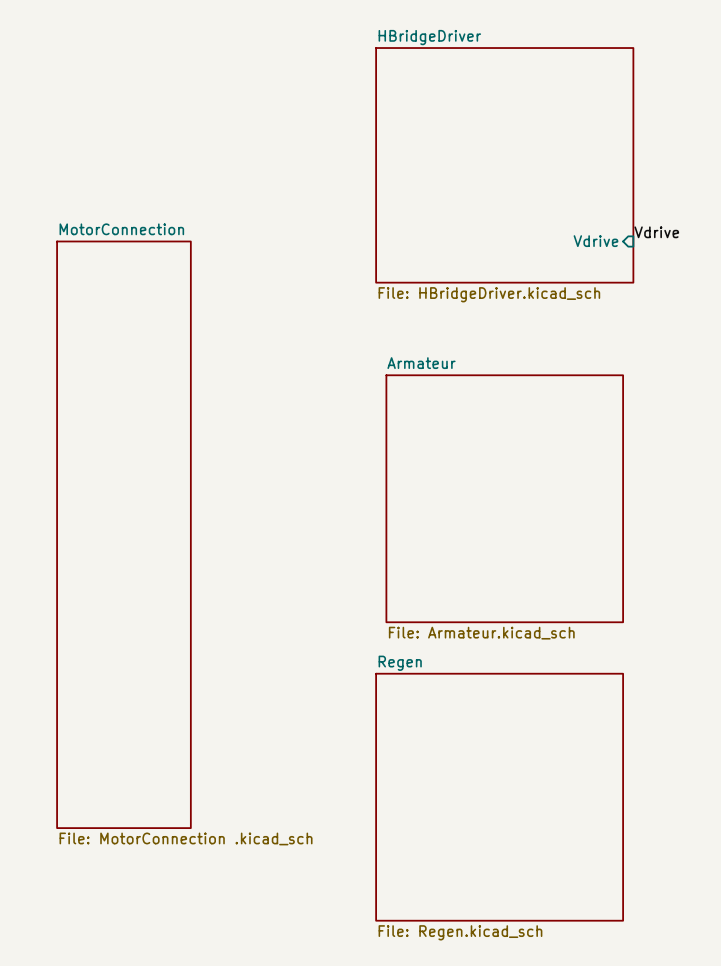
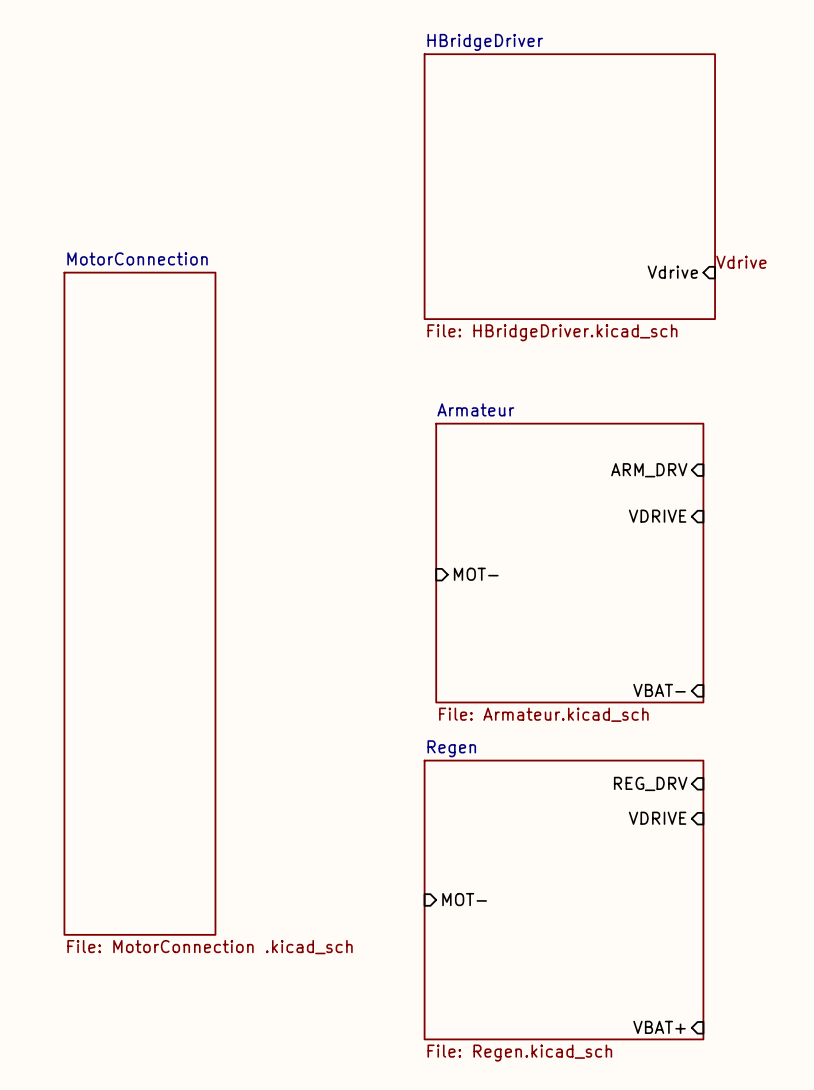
sheet pin: none -> ARM_DRV (649, 470)
sheet pin: none -> VDRIVE (657, 516)
sheet pin: none -> MOT- (476, 574)
sheet pin: none -> VBAT- (659, 690)
sheet pin: none -> REG_DRV (650, 783)
sheet pin: none -> VDRIVE (657, 818)
sheet pin: none -> MOT- (464, 899)
sheet pin: none -> VBAT+ (659, 1027)

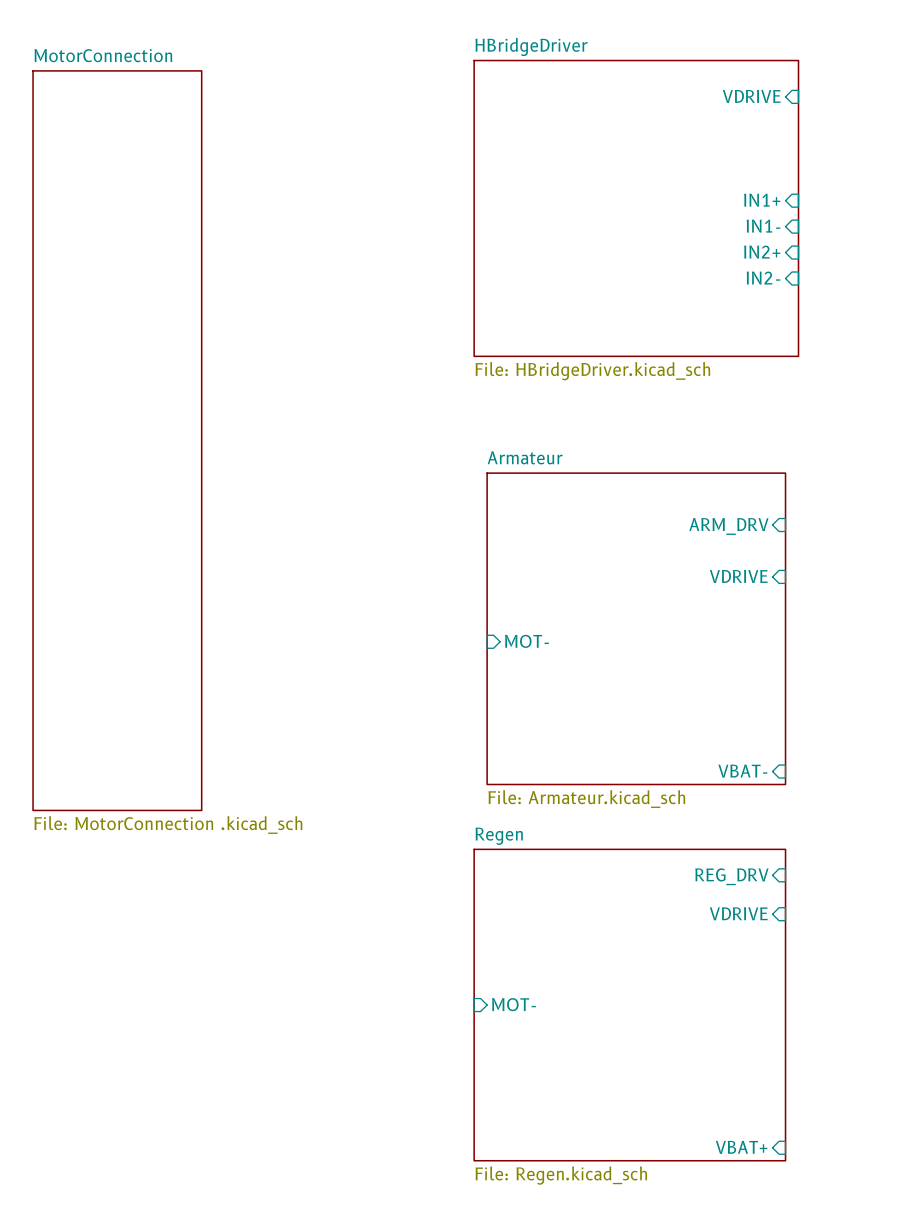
sheet pin: none -> VDRIVE (751, 96)
sheet pin: none -> IN1+ (762, 200)
sheet pin: none -> IN1- (763, 226)
sheet pin: none -> IN2+ (762, 252)
sheet pin: none -> IN2- (763, 278)
label: Vdrive (741, 262) -> none
sheet pin: Vdrive (672, 272) -> none
sheet MotorConnection position: (139, 603) -> (117, 440)

